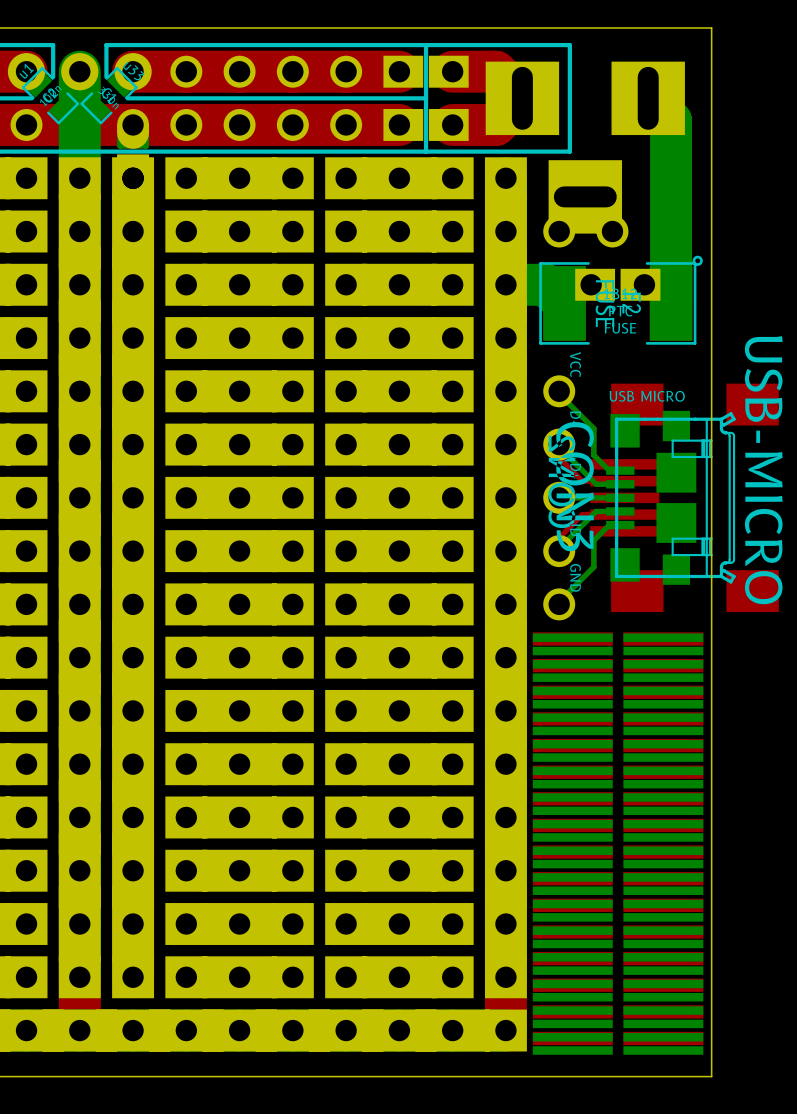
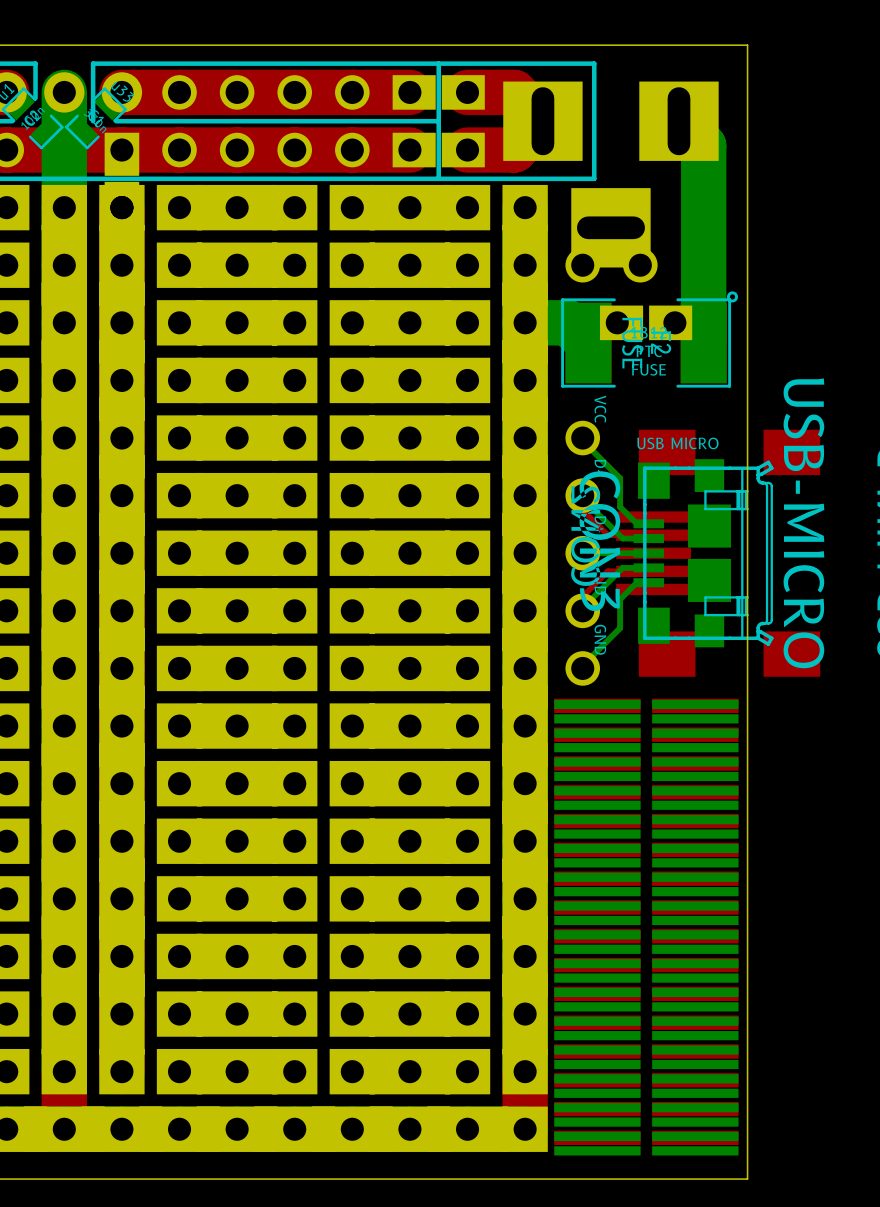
line: none -> (93, 98) (93, 121)
part footprint: [117, 108, 150, 195] -> [104, 132, 140, 225]

